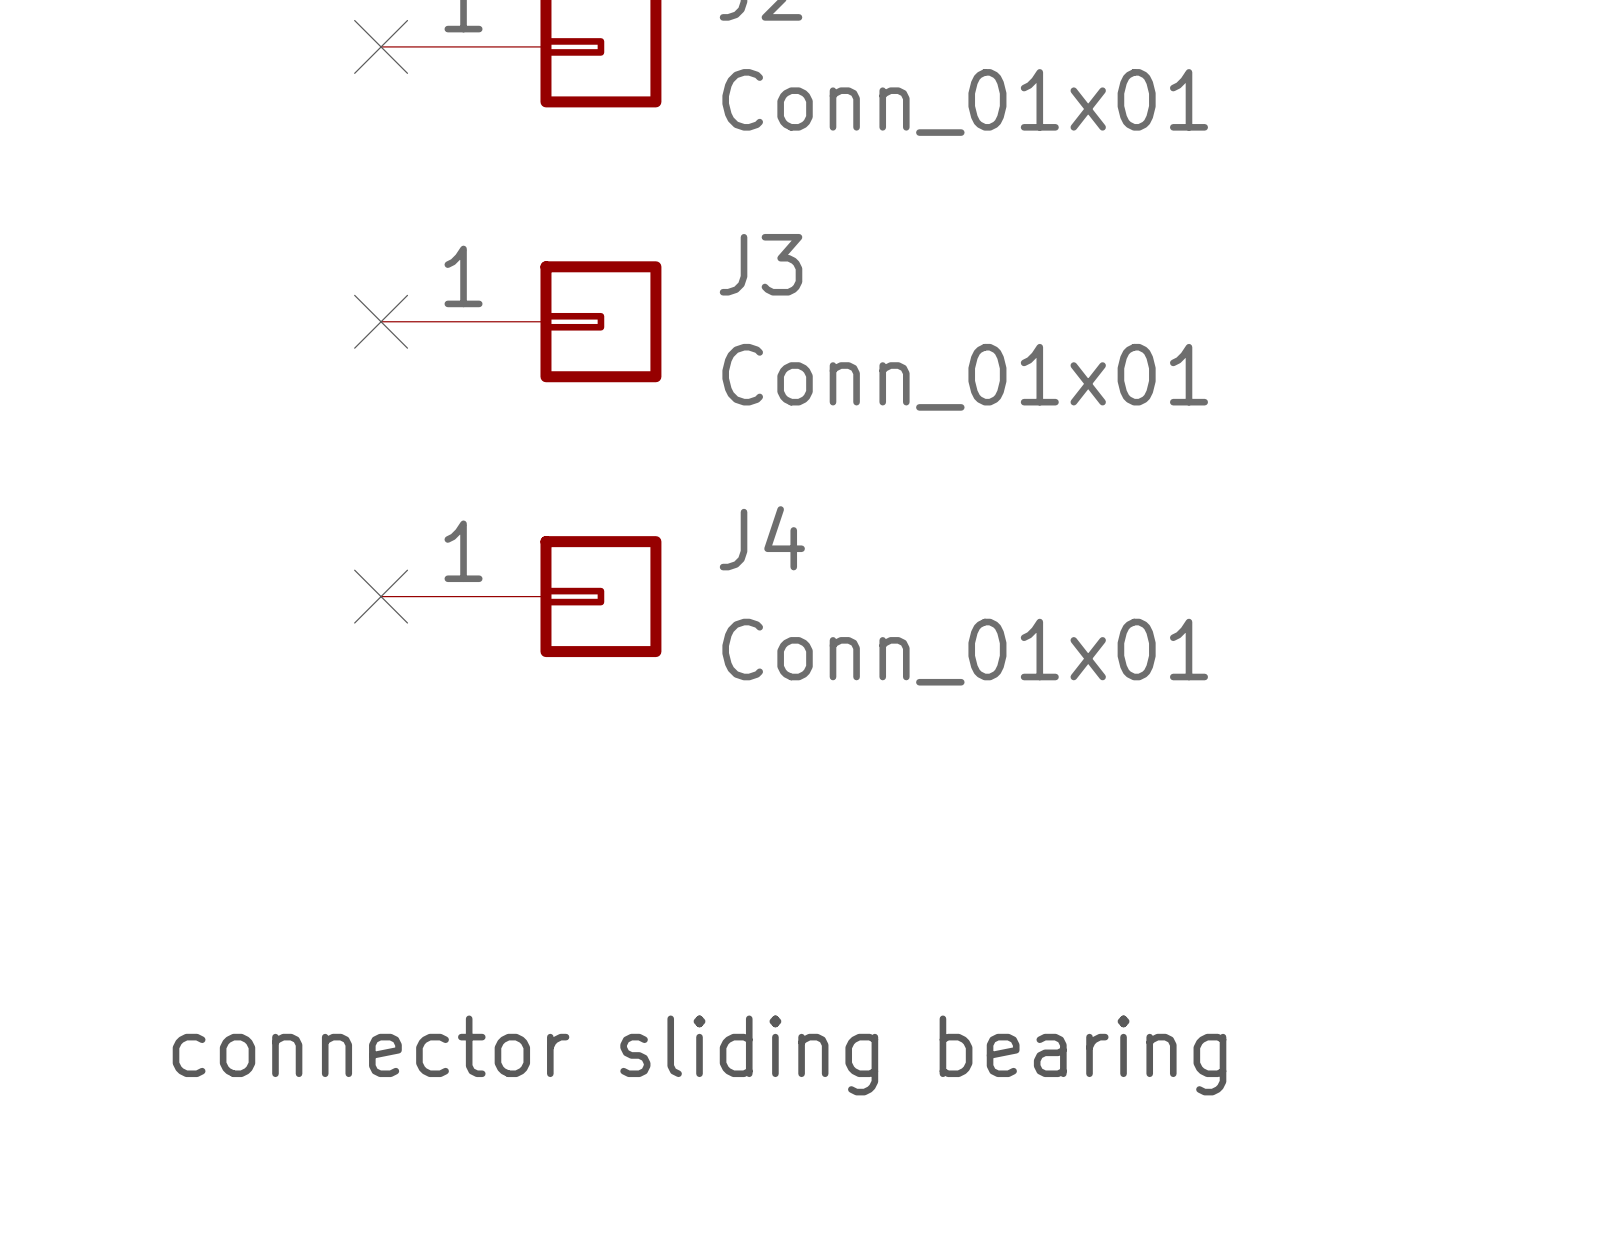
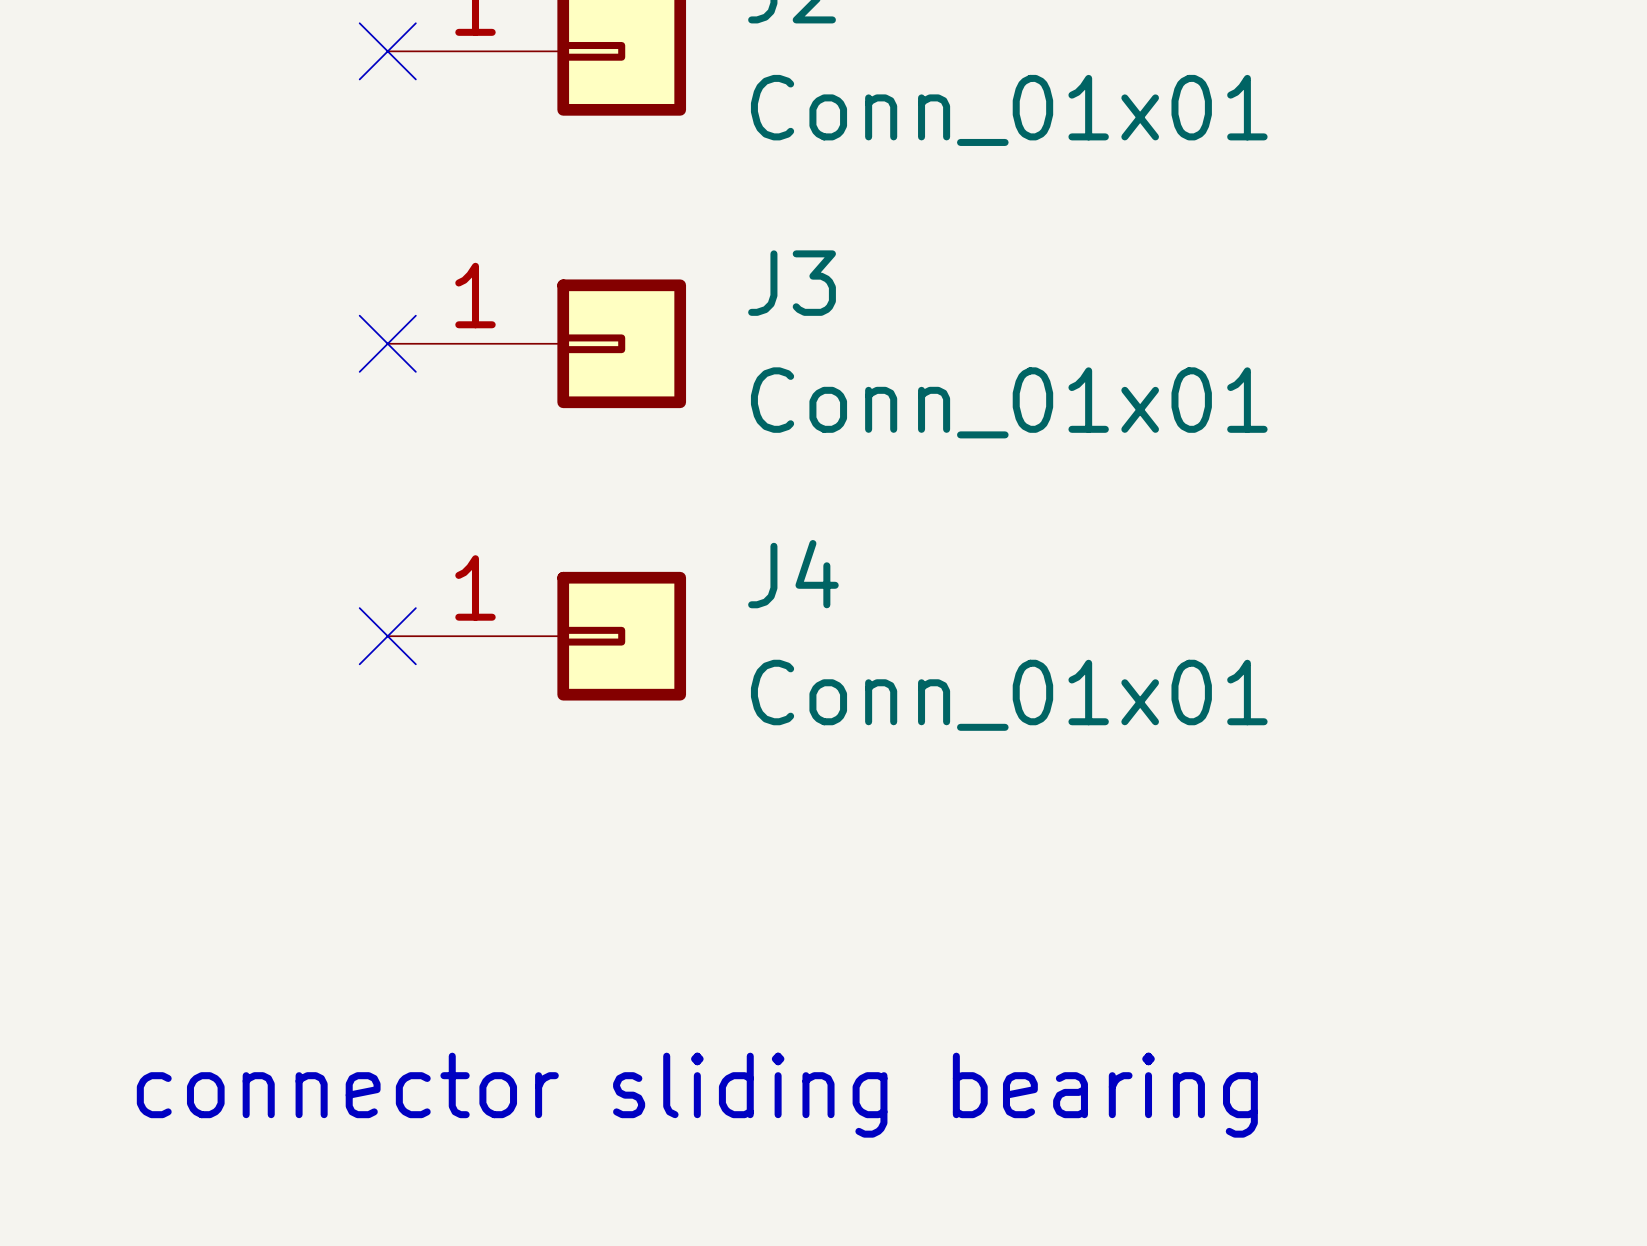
text position: connector sliding bearing (699, 1055) -> connector sliding bearing (697, 1095)

